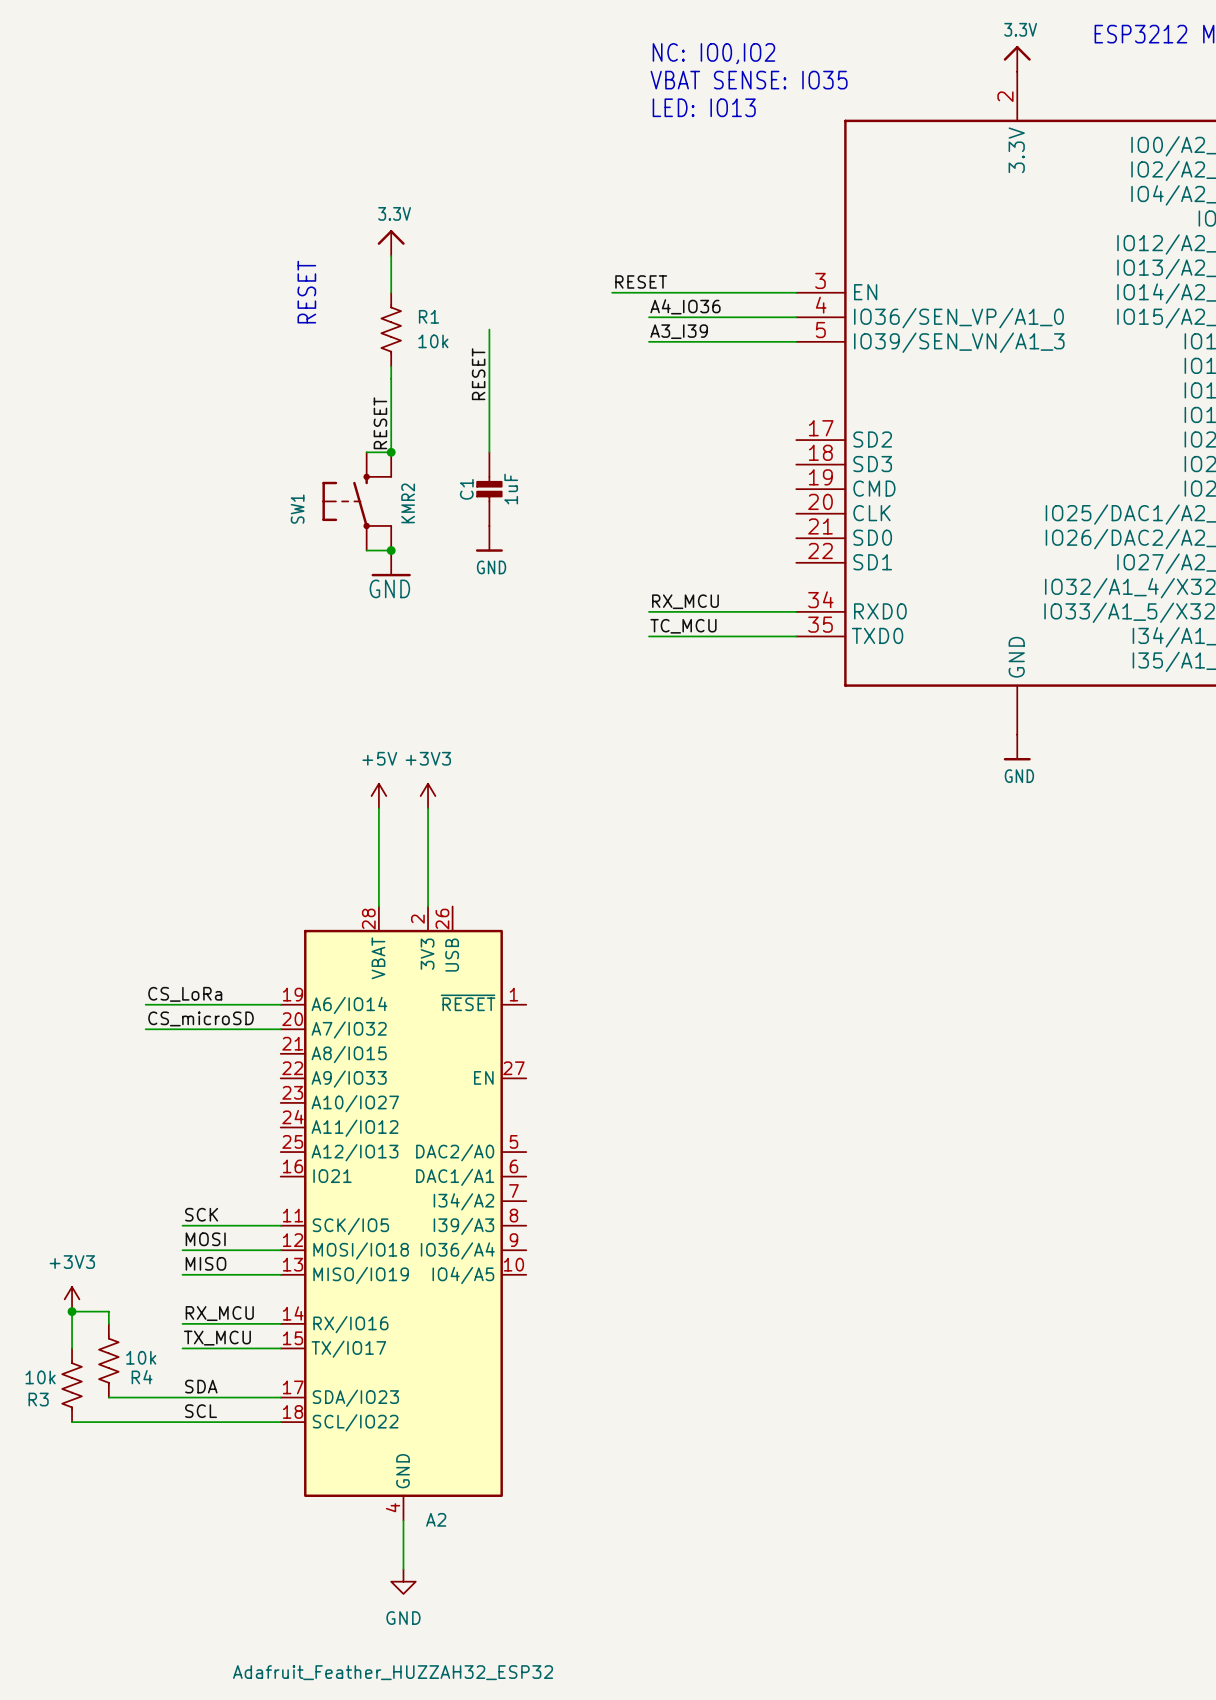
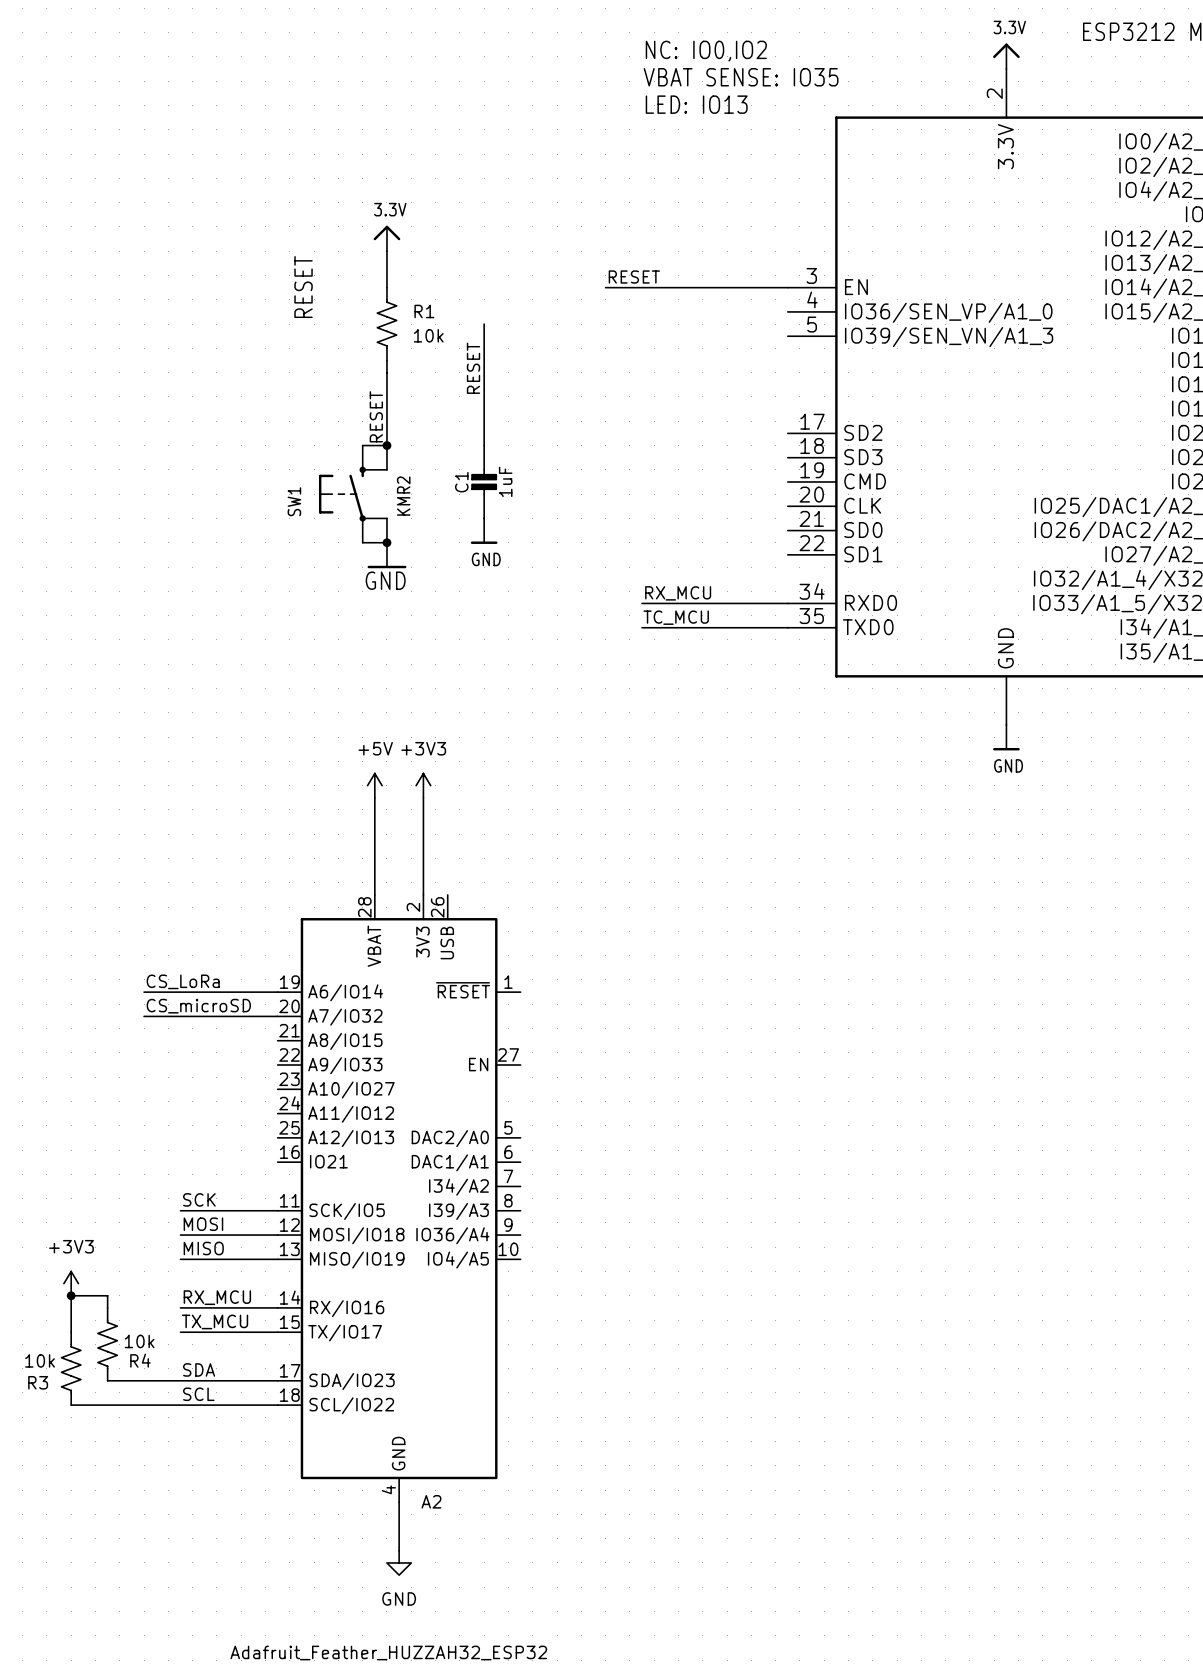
label: A4_IO36 (685, 306) -> none
wire: (648, 317) (796, 317) -> none
label: A3_I39 (679, 331) -> none
wire: (648, 341) (796, 341) -> none

